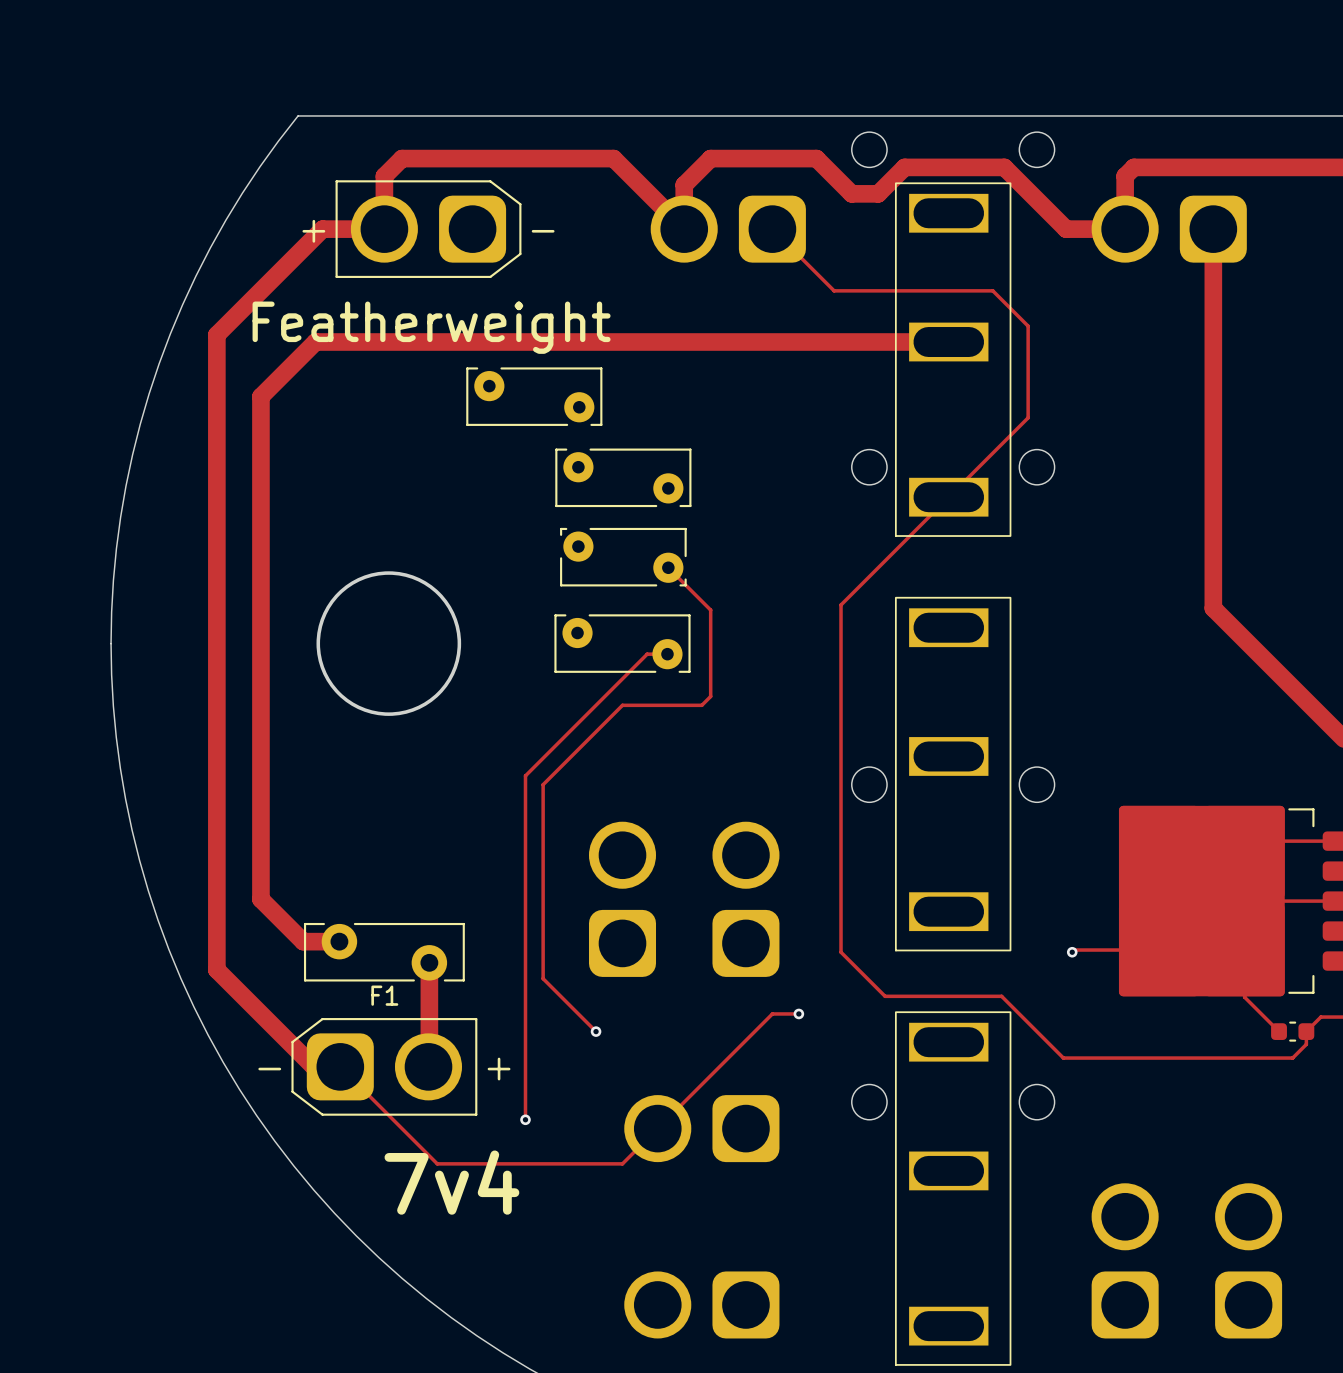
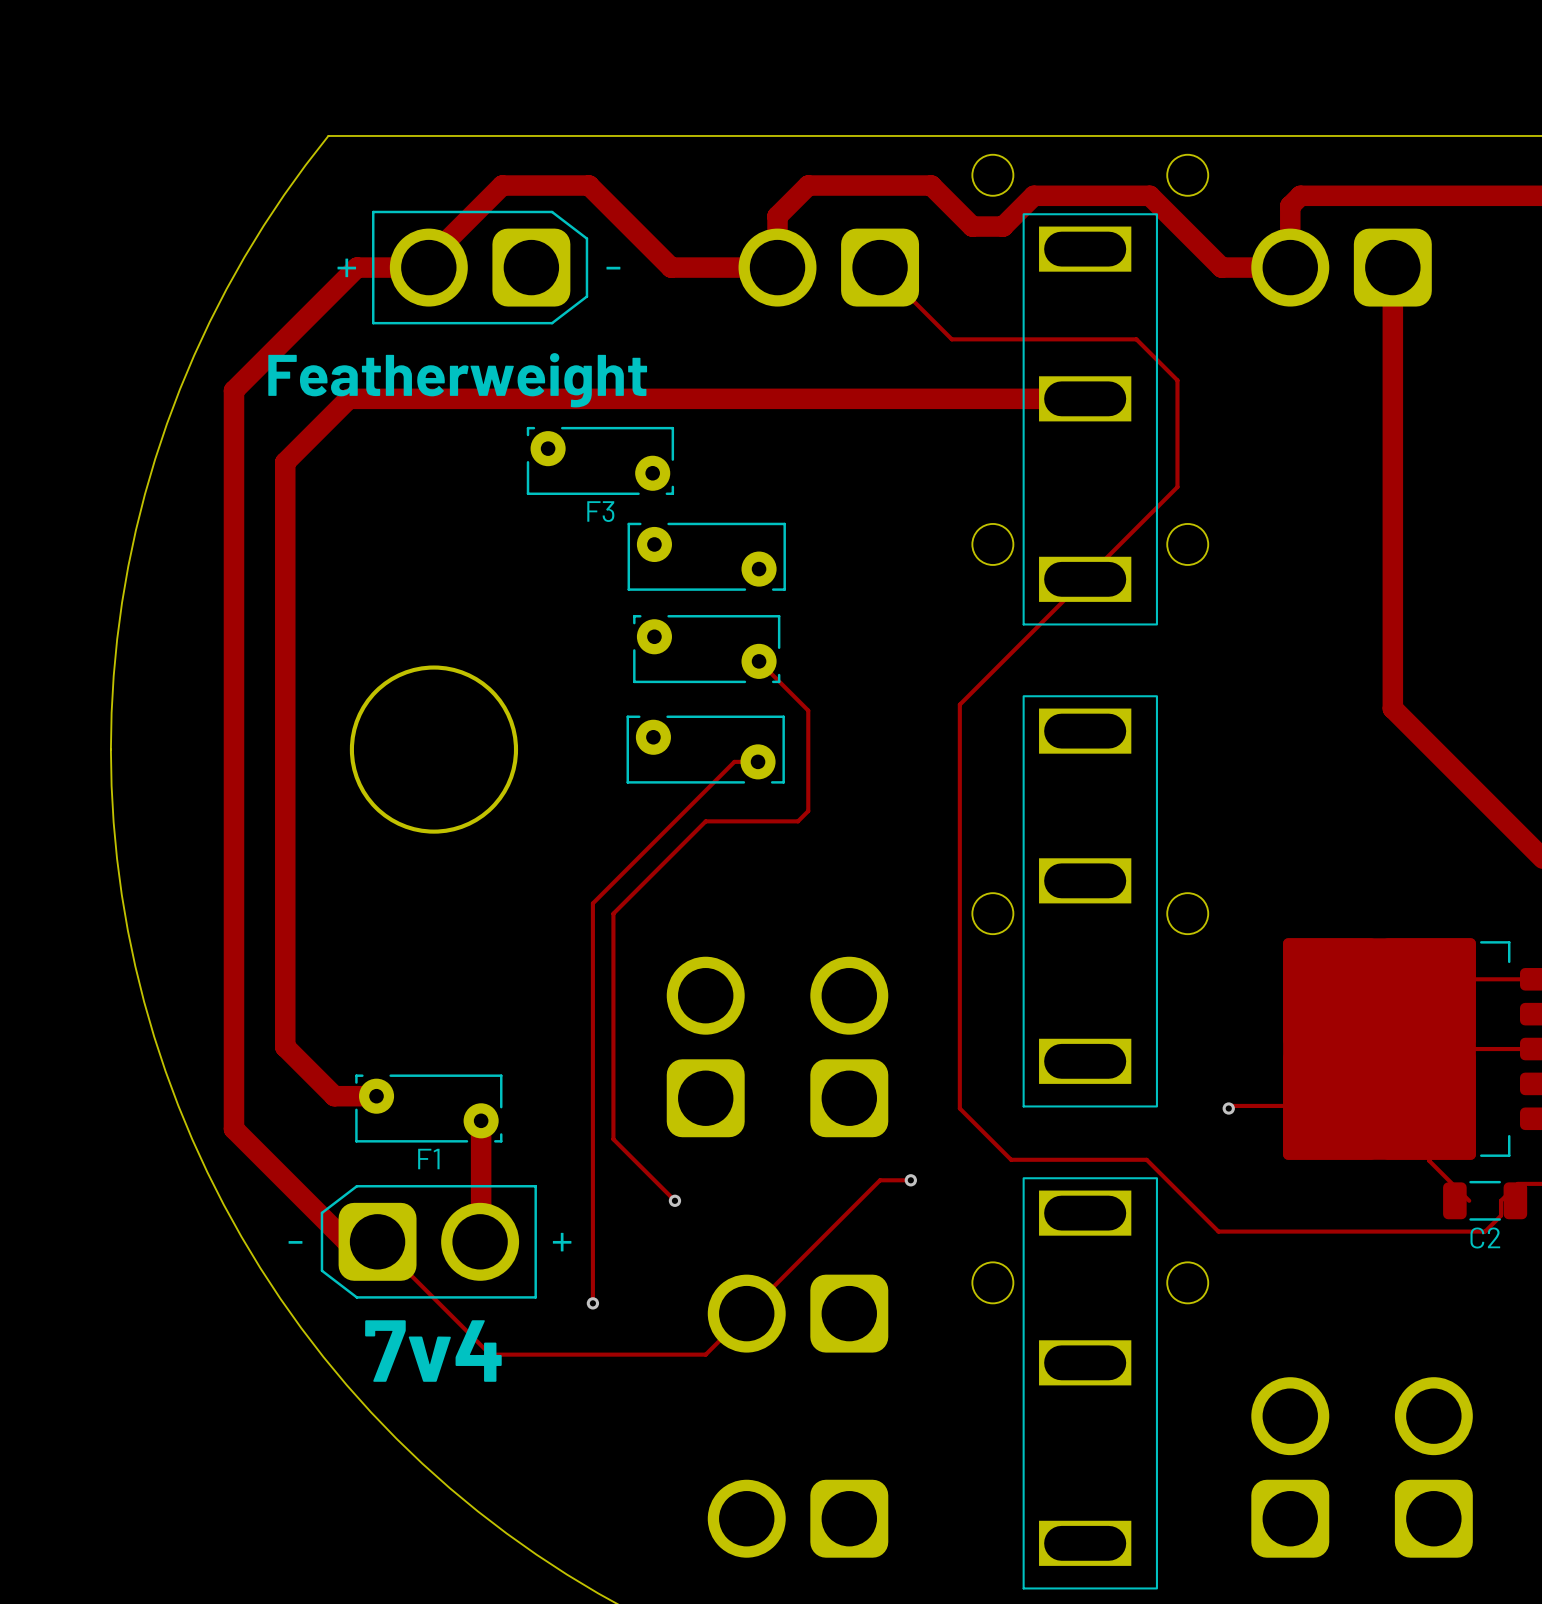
track: (447, 158) (402, 158) (384, 176) (384, 221) -> (502, 185) (428, 258)
track: (522, 158) (613, 158) (684, 229) -> (589, 185) (671, 267) (777, 267)
F3: none -> (600, 460)
part: (534, 396) -> none
F1 footprint: [303, 922, 465, 982] -> [355, 1074, 503, 1143]
part: (1292, 1031) -> none
C2: none -> (1485, 1200)
text position: 7v4 (451, 1182) -> 7v4 (433, 1351)

